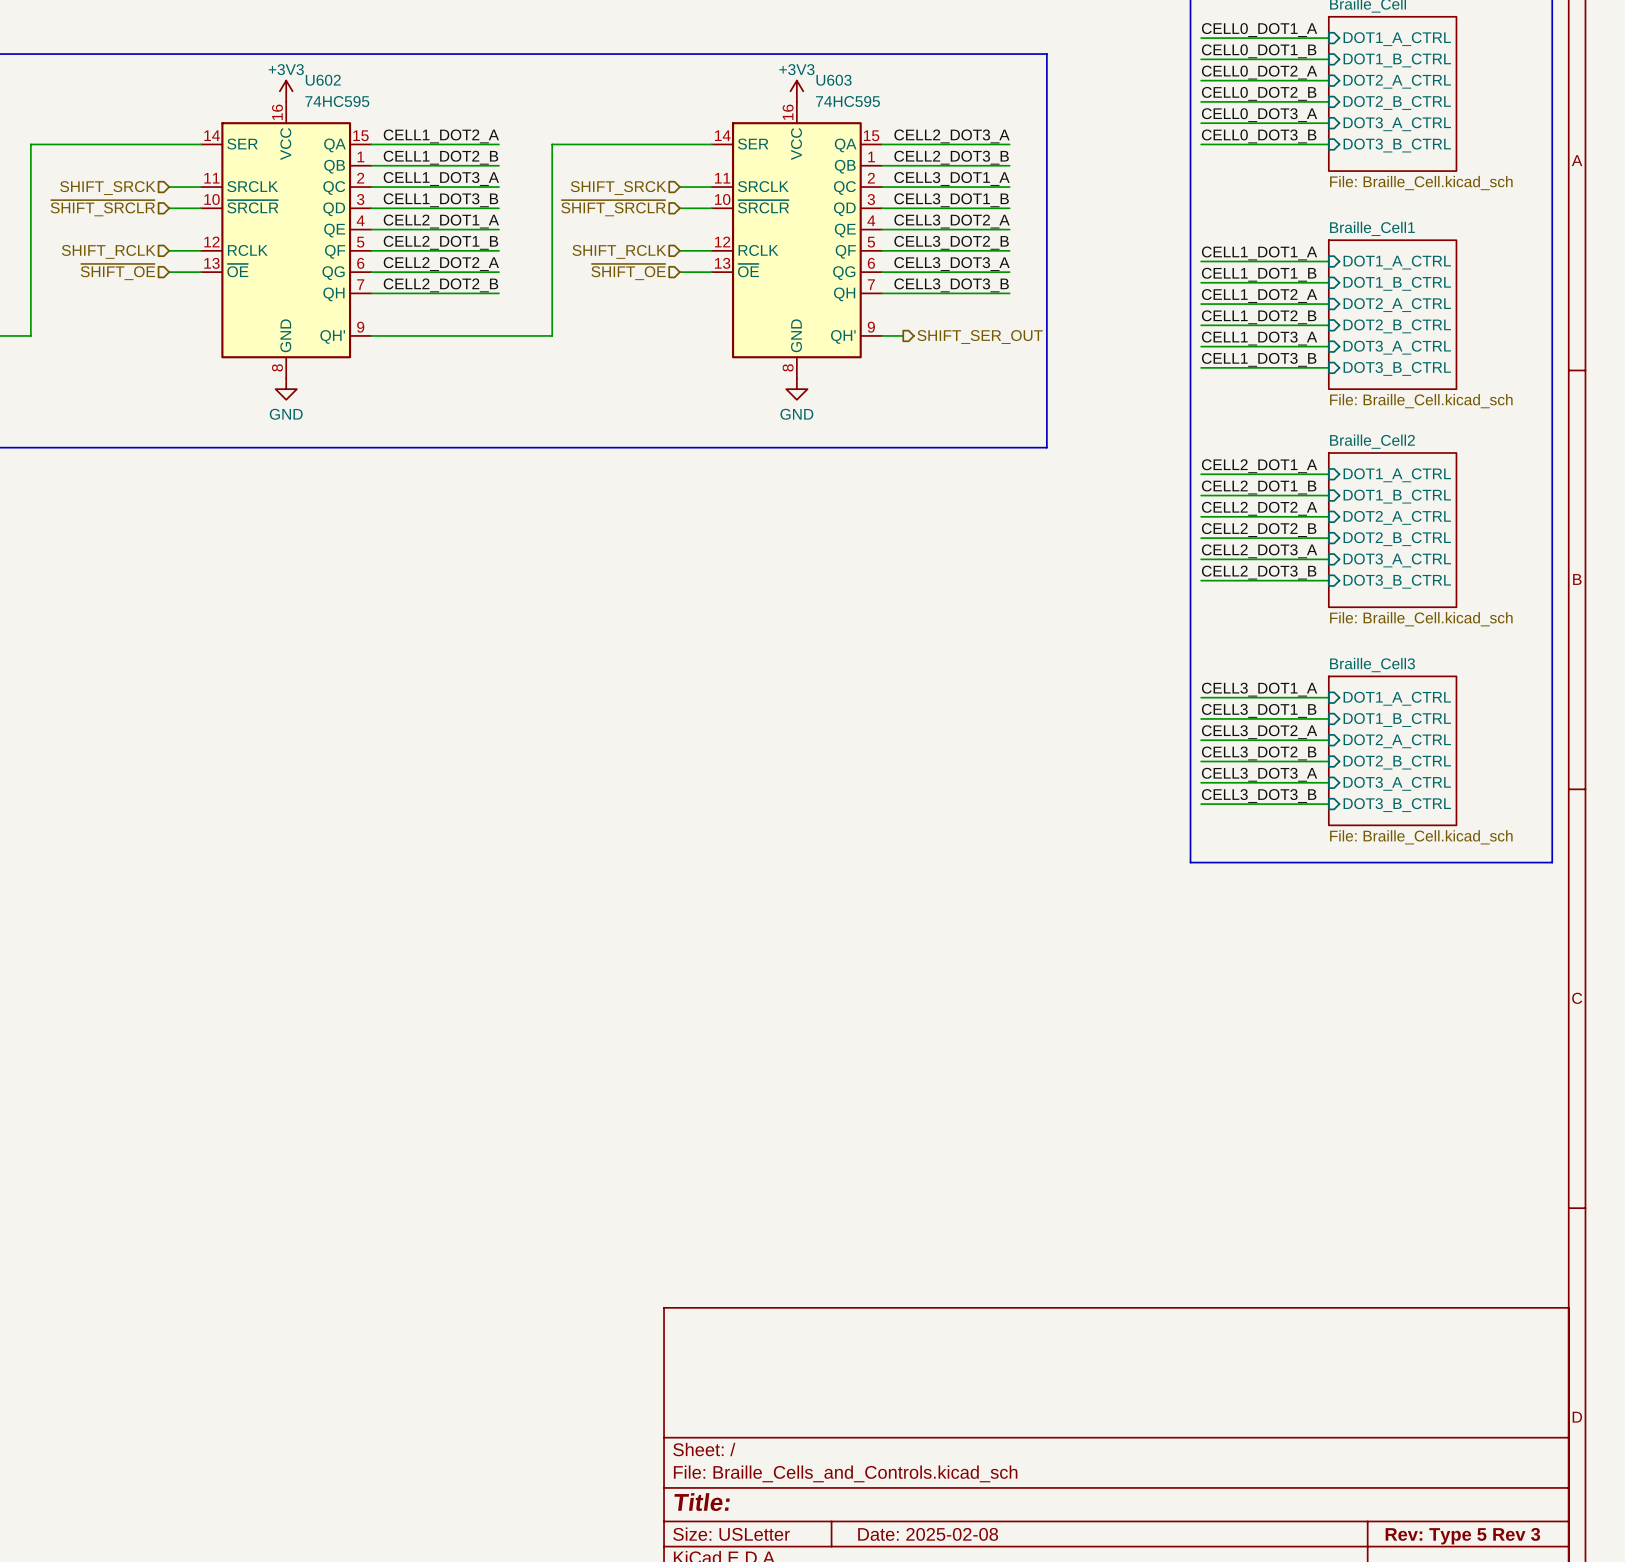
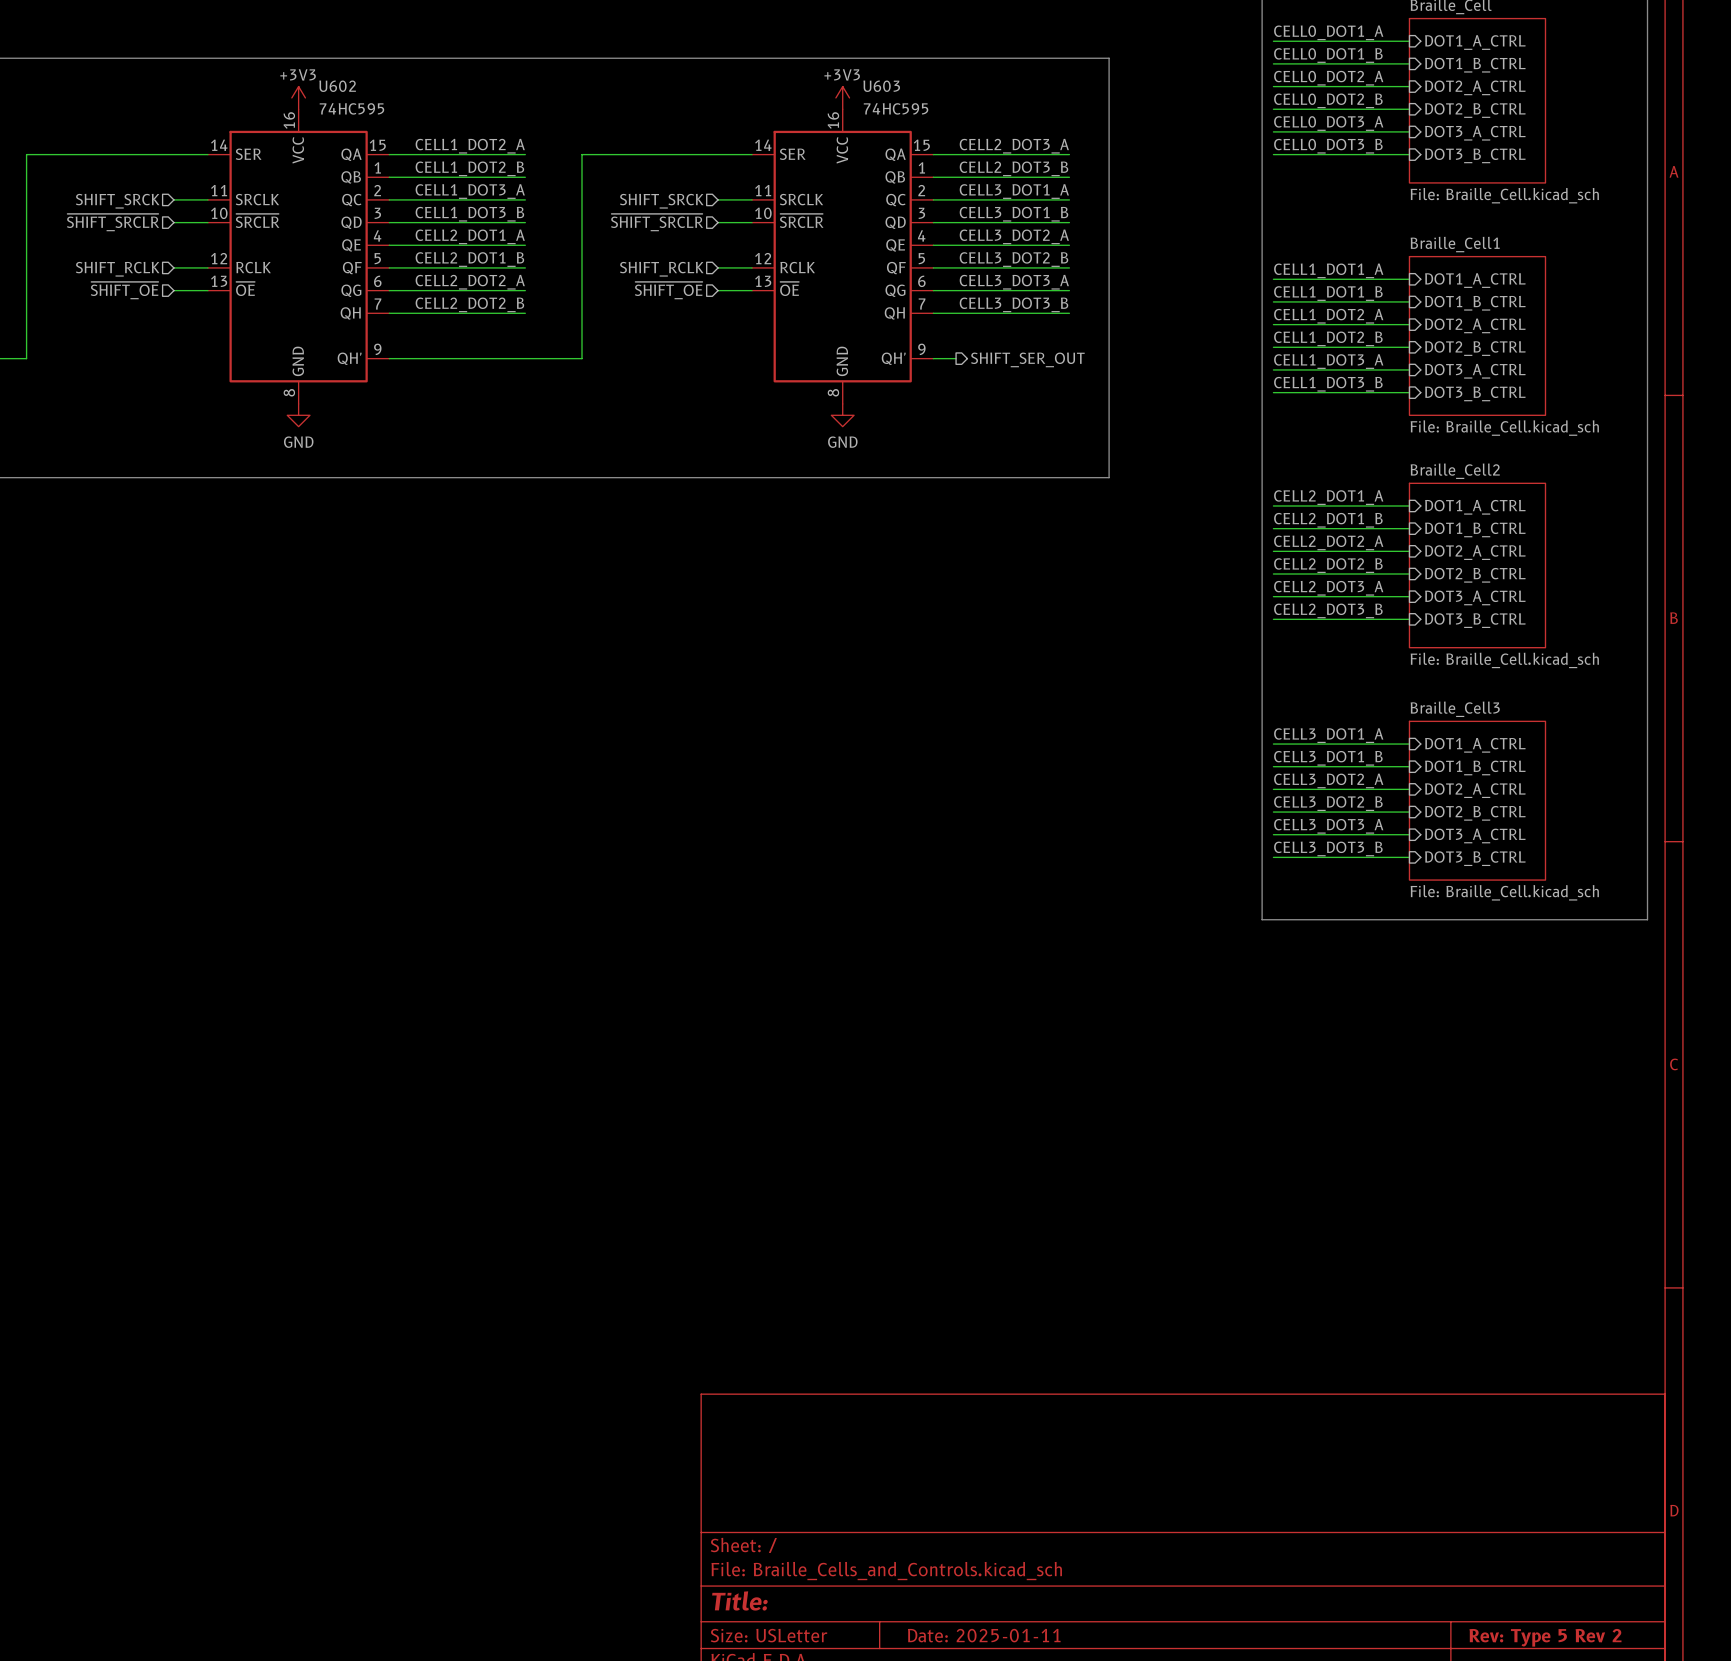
title block: Date: 2025-02-08 (928, 1534) -> Date: 2025-01-11 (984, 1635)
title block: Rev: Type 5 Rev 3 (1462, 1536) -> Rev: Type 5 Rev 2 (1545, 1637)

